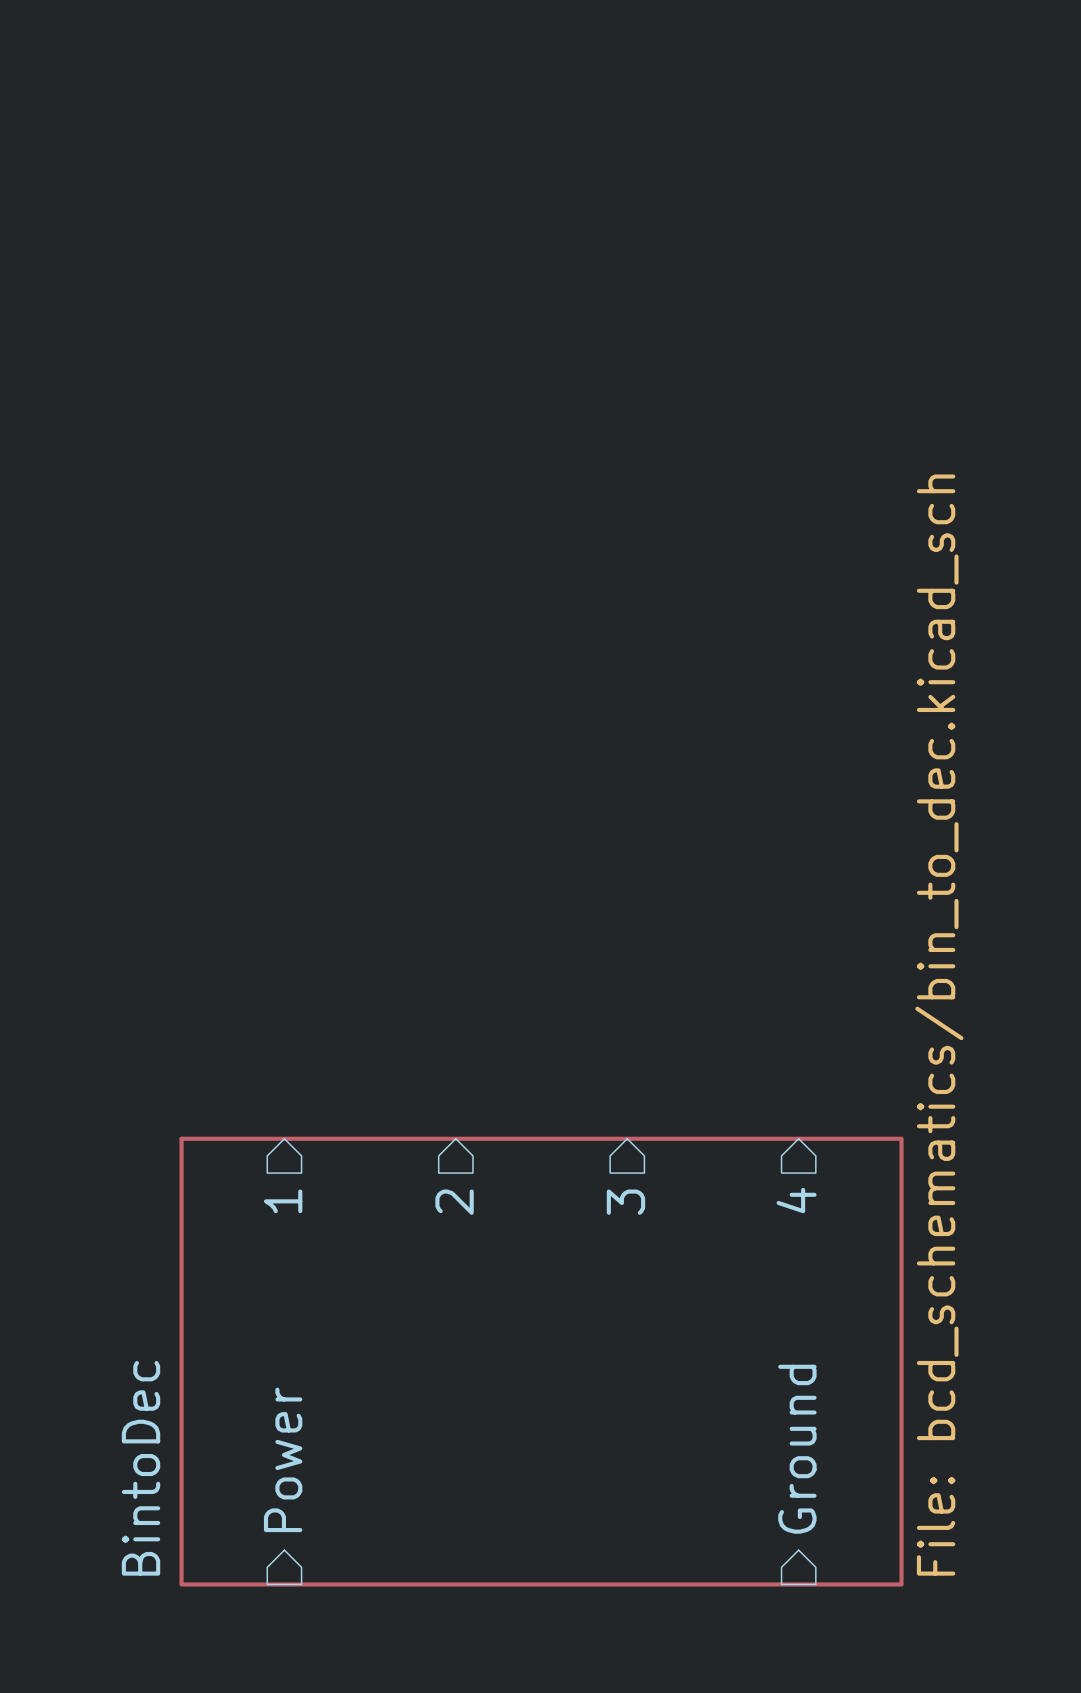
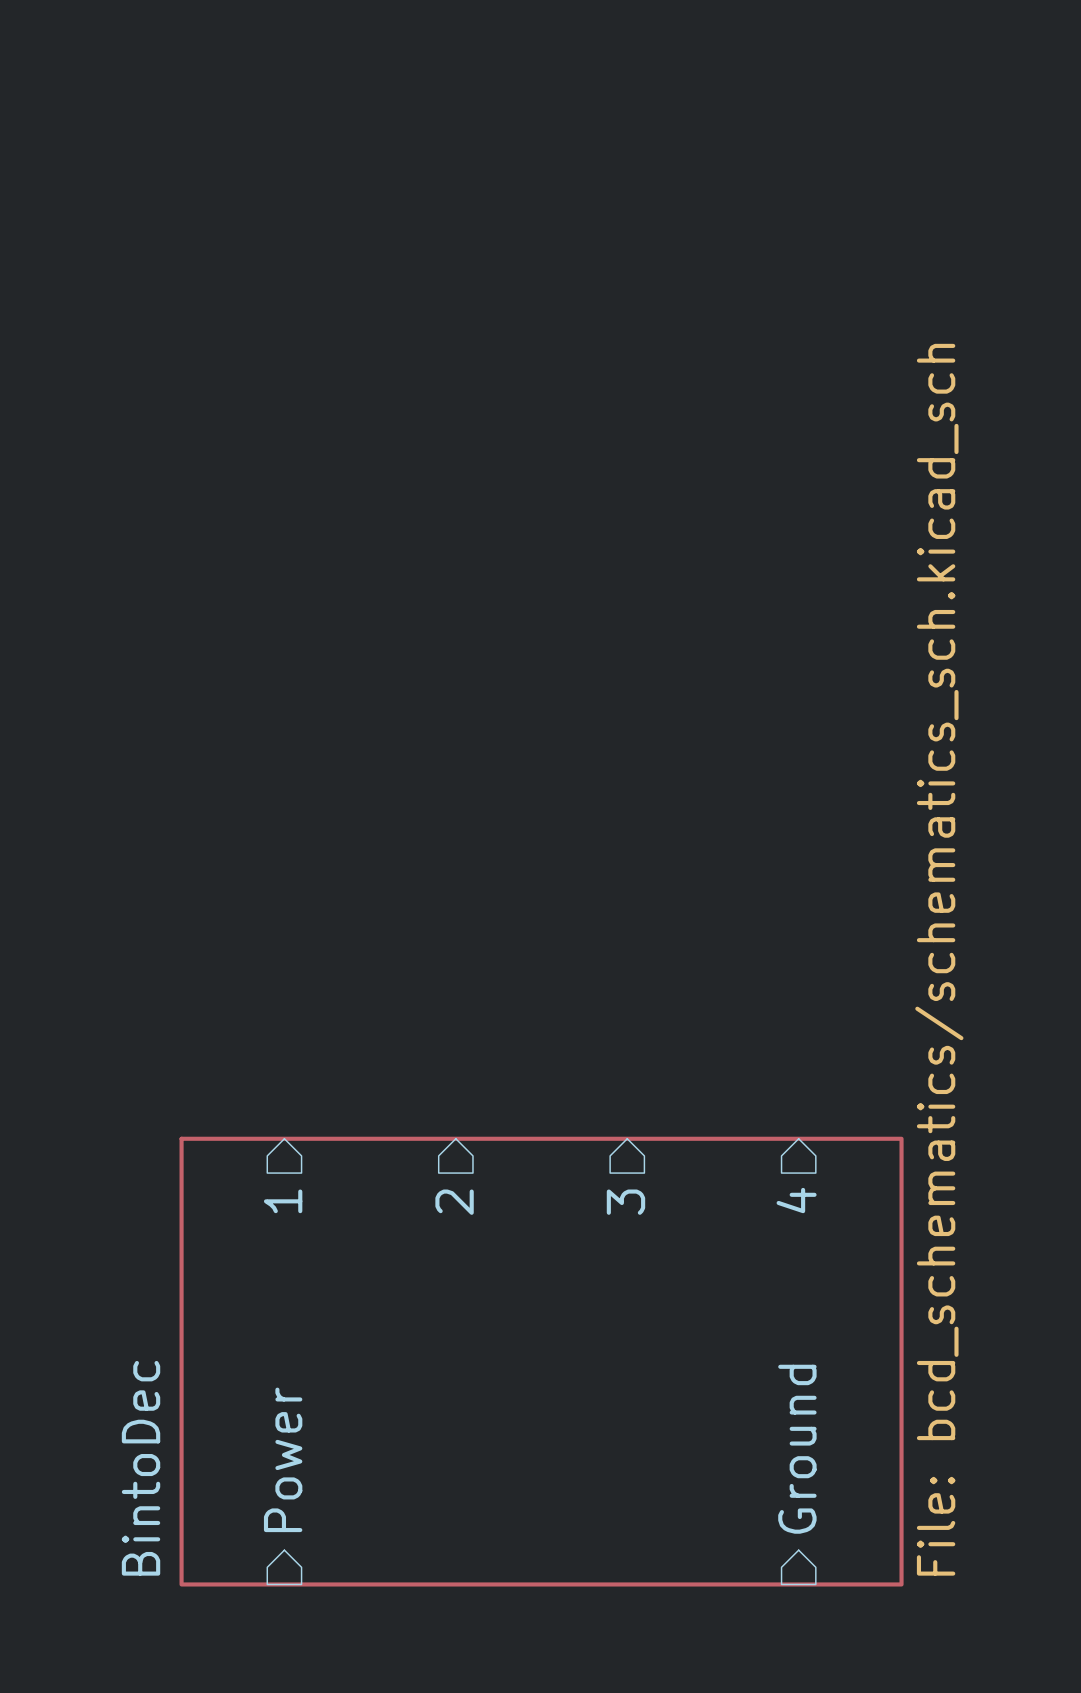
sheet BintoDec value: File: bcd_schematics/bin_to_dec.kicad_sch (939, 1025) -> File: bcd_schematics/schematics_sch.kicad_sch (939, 959)

